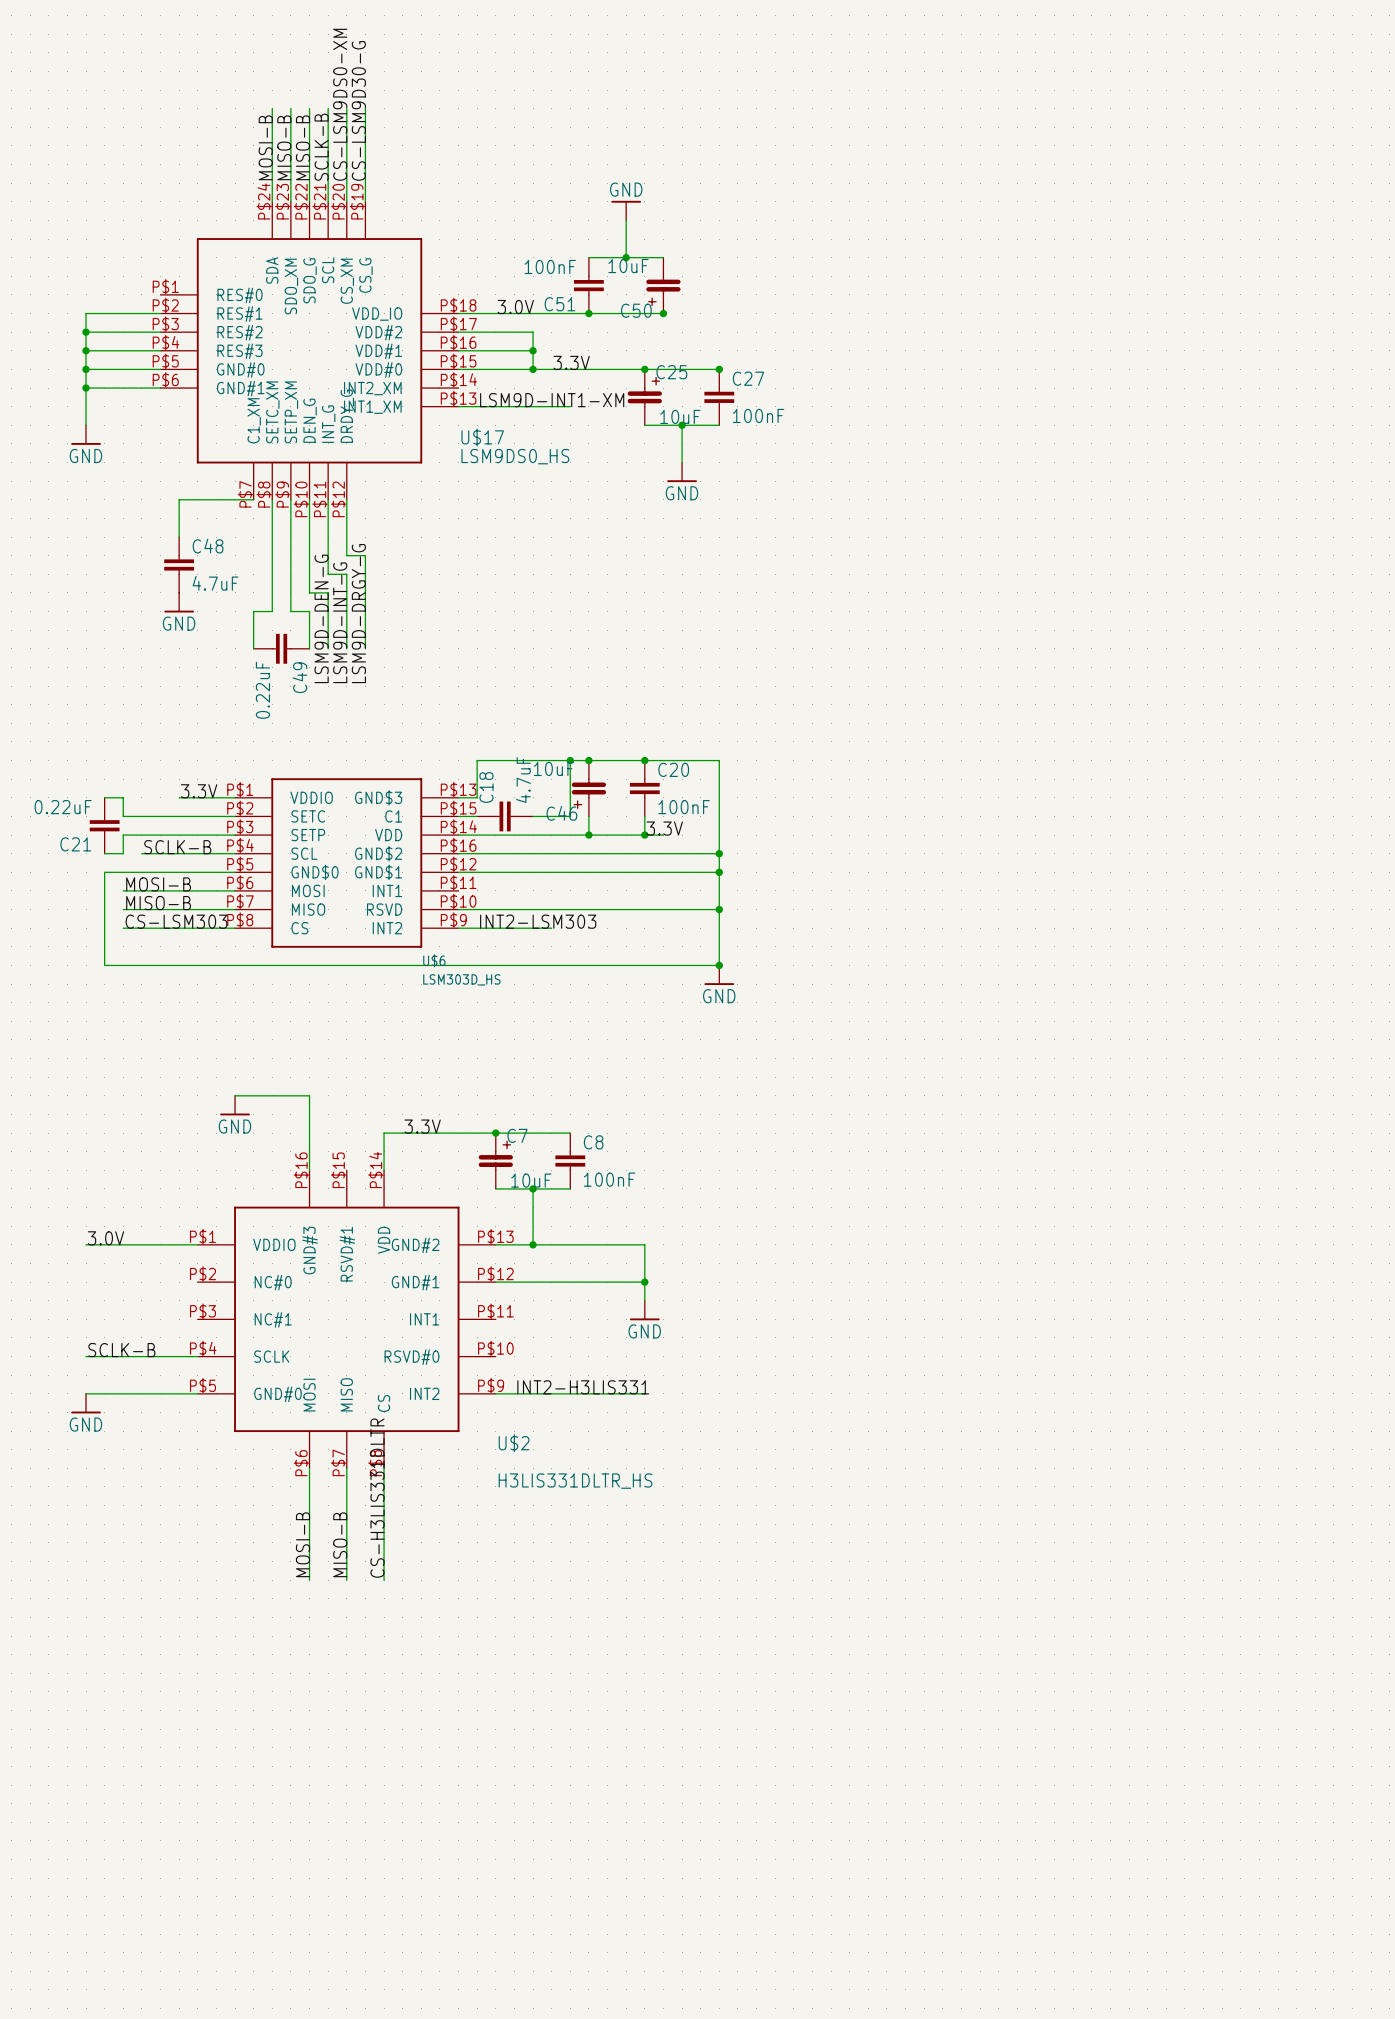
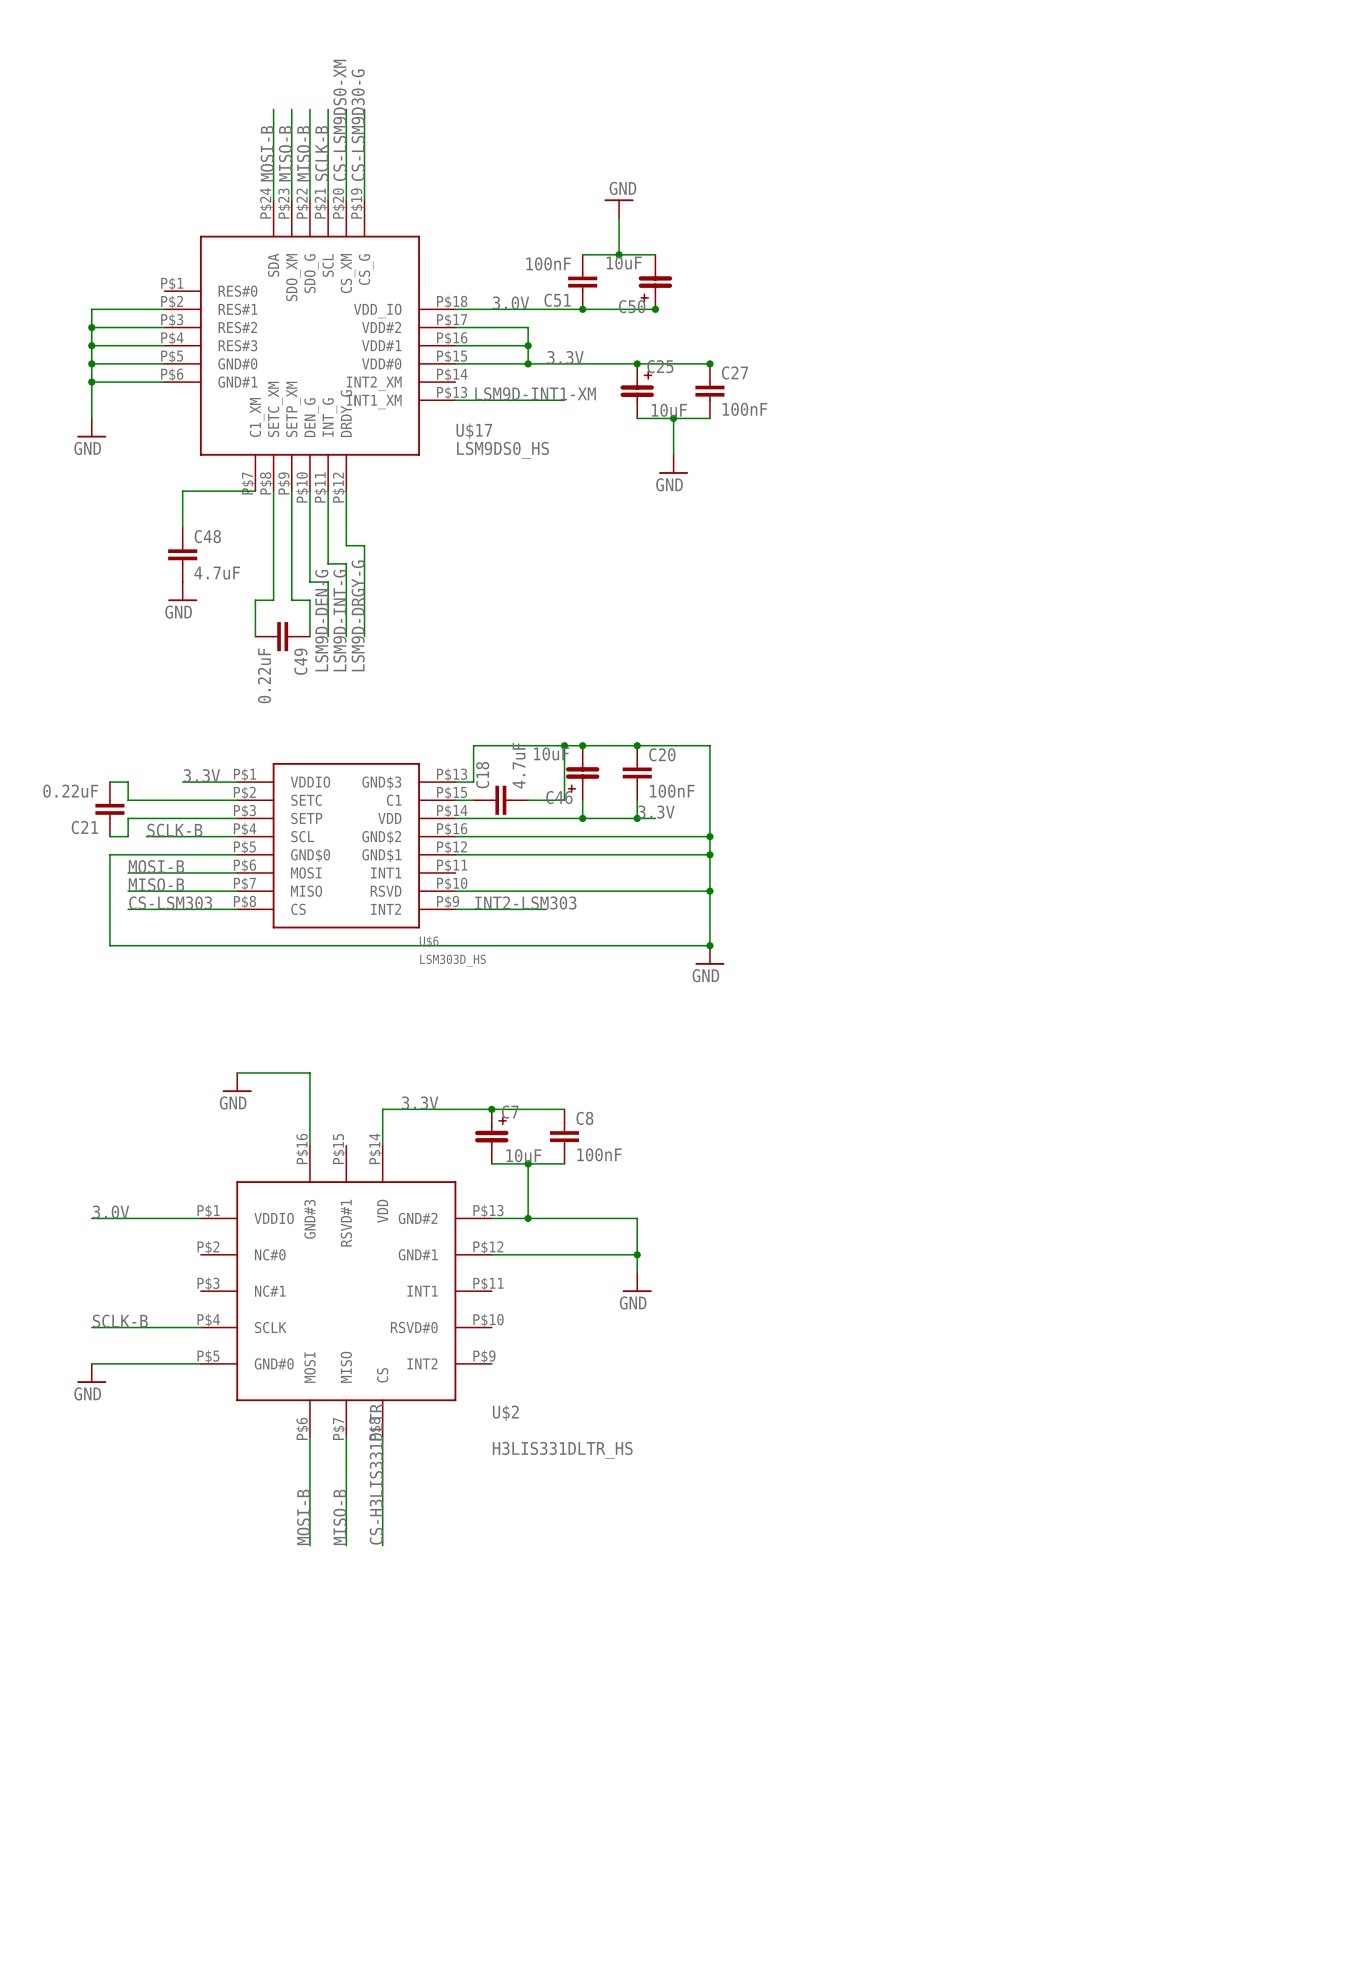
label: INT2-H3LIS331 (583, 1387) -> none
wire: (495, 1393) (644, 1393) -> none

